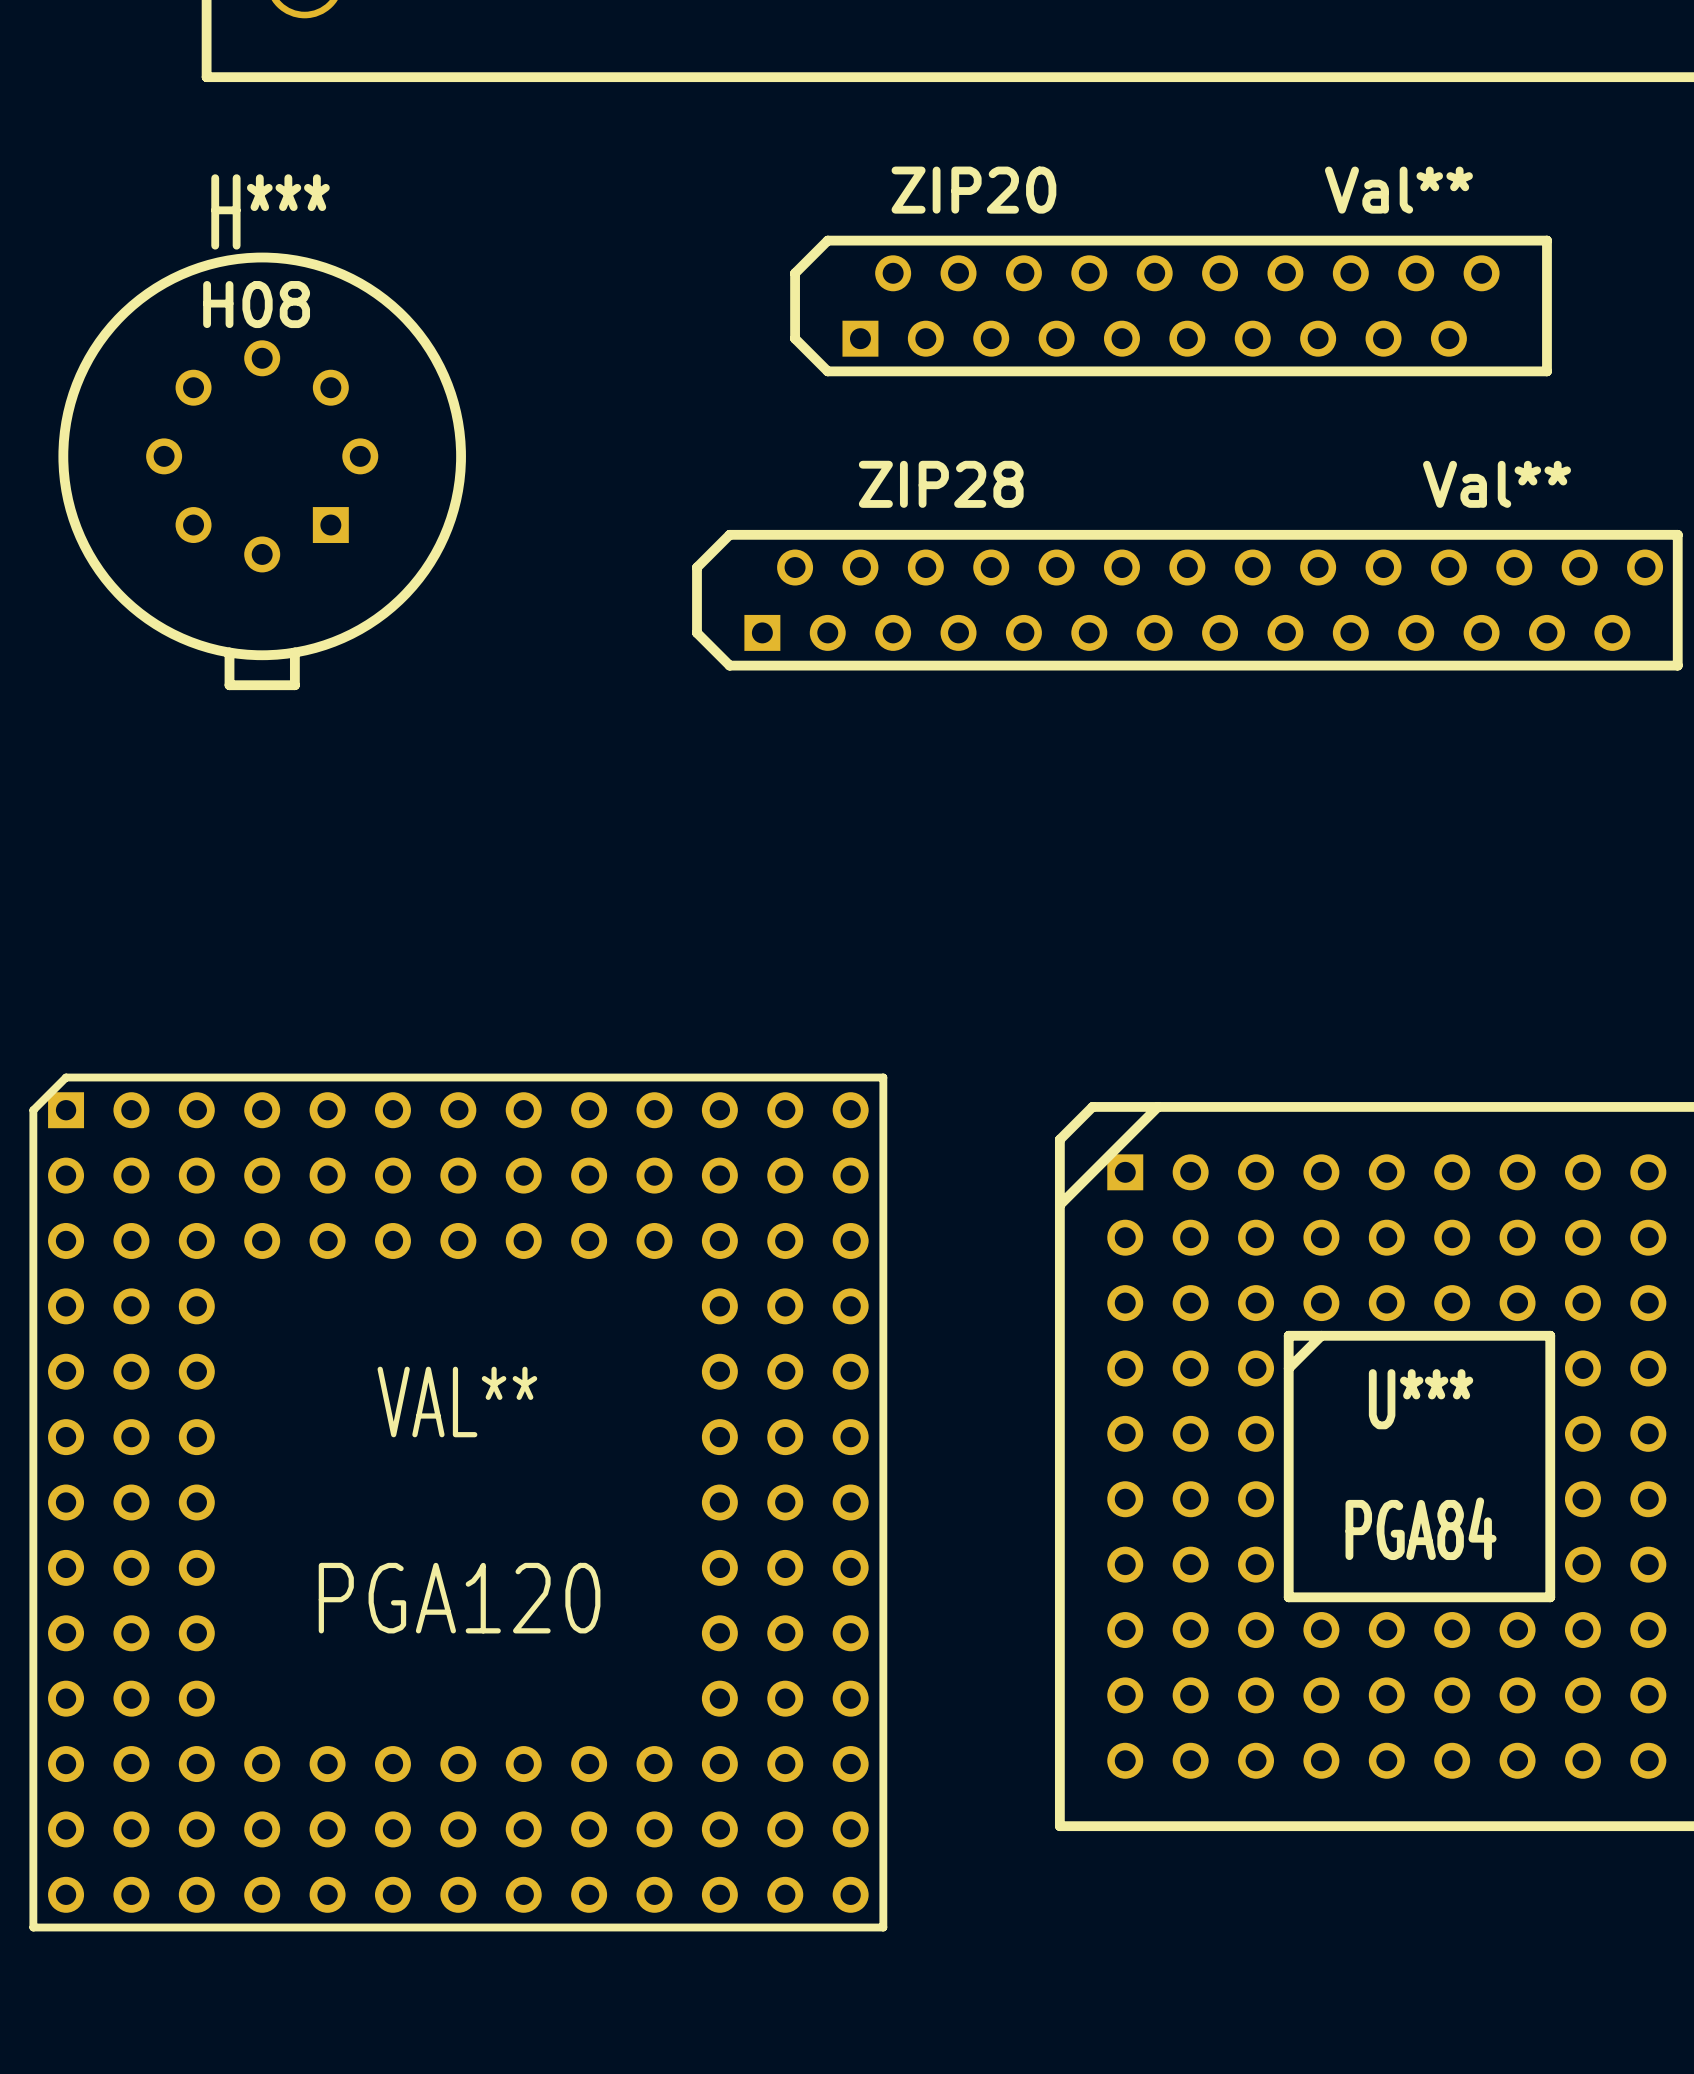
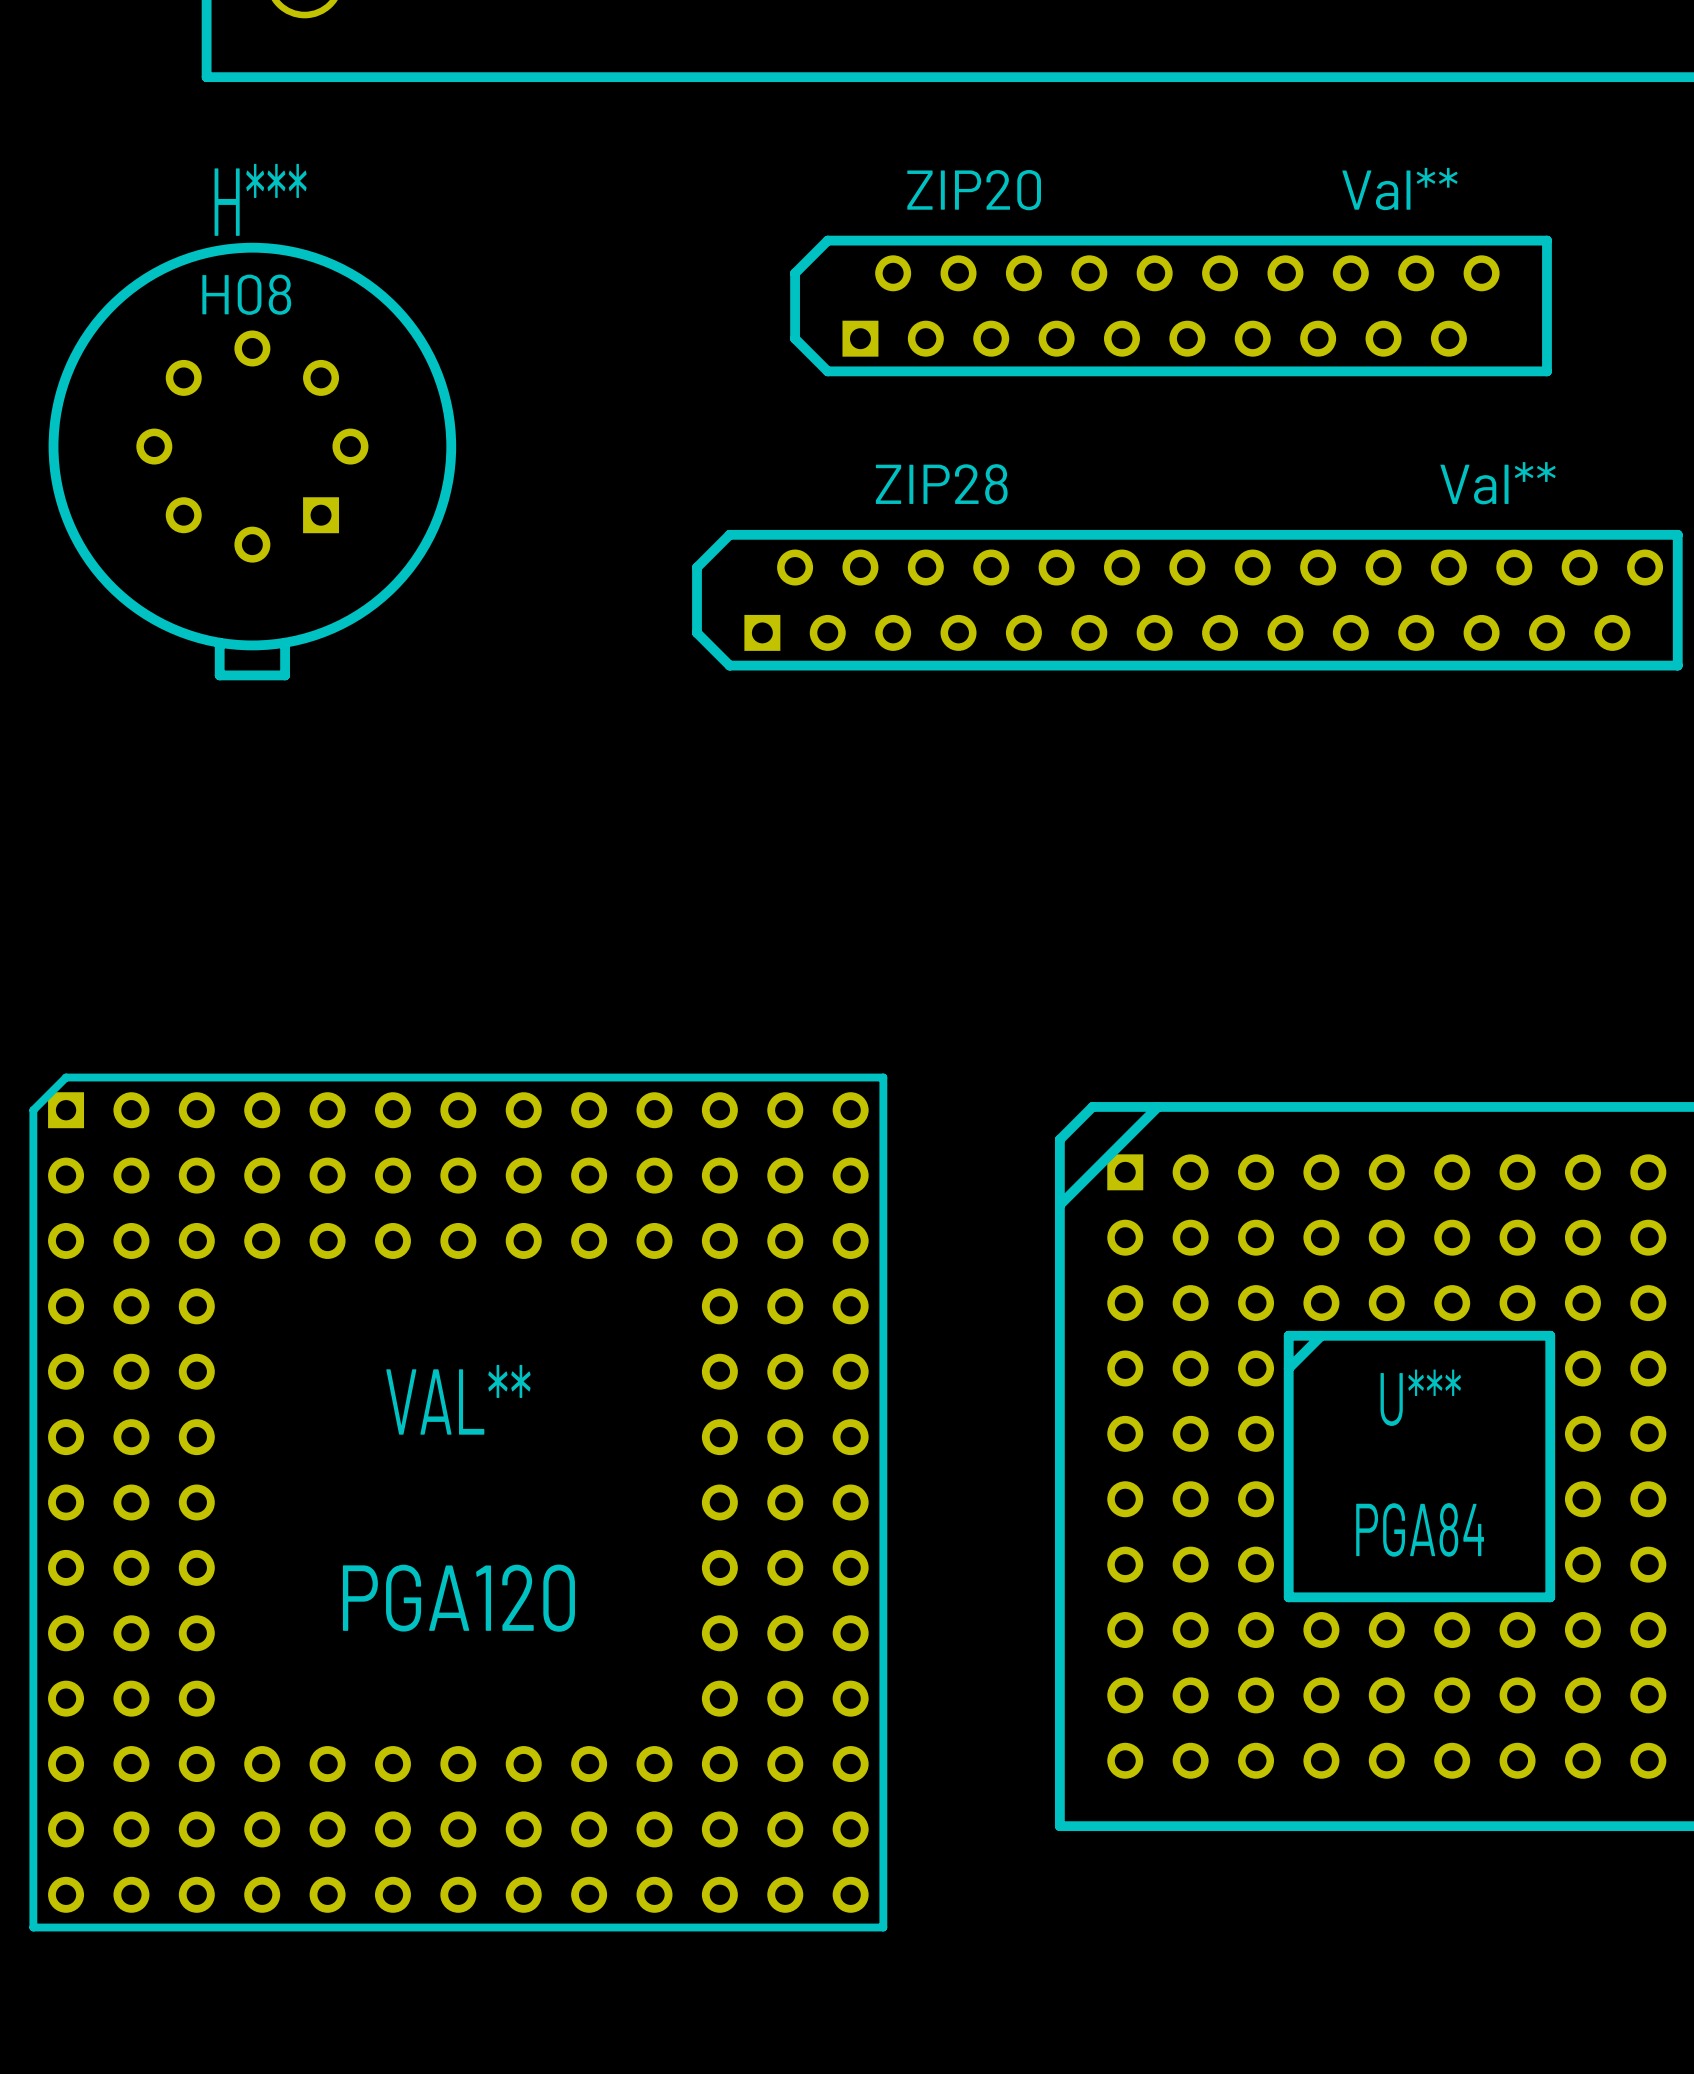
H*** position: (262, 471) -> (252, 461)

